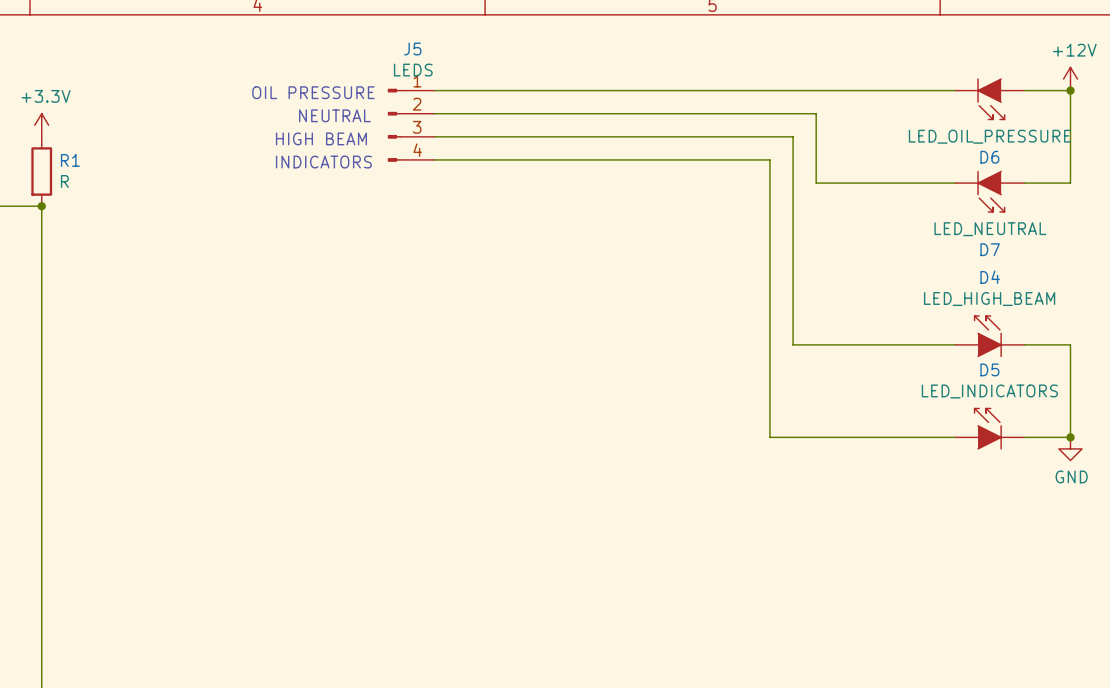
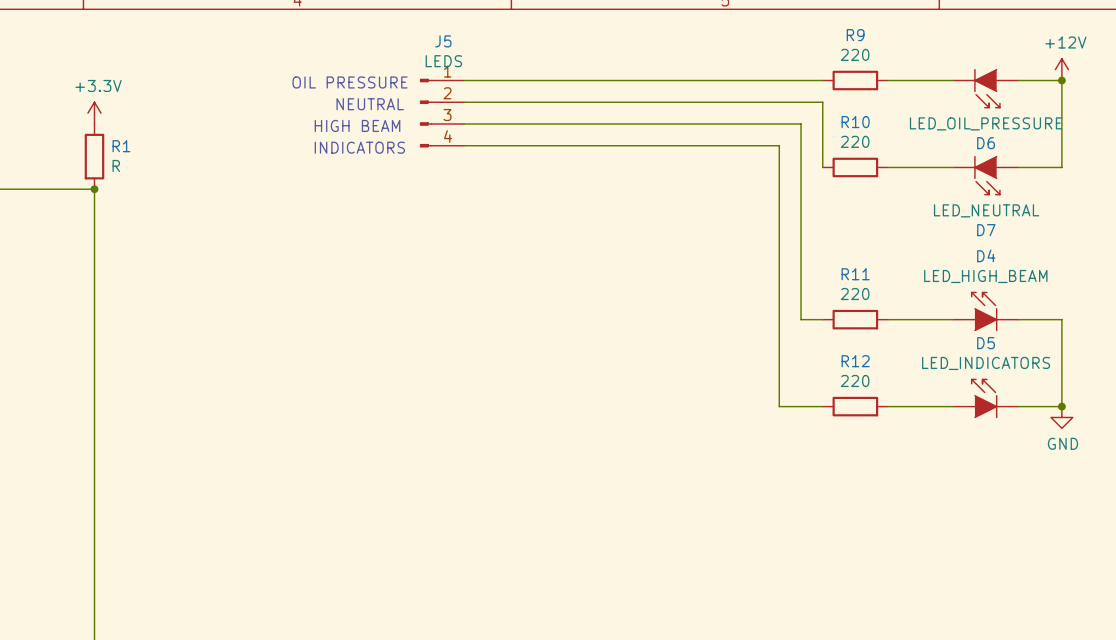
wire: (816, 90) (885, 90) -> none
R9: none -> 220 (855, 80)
wire: (816, 183) (885, 183) -> none
R10: none -> 220 (855, 167)
wire: (816, 344) (885, 344) -> none
R11: none -> 220 (855, 319)
wire: (816, 437) (885, 437) -> none
R12: none -> 220 (855, 406)

